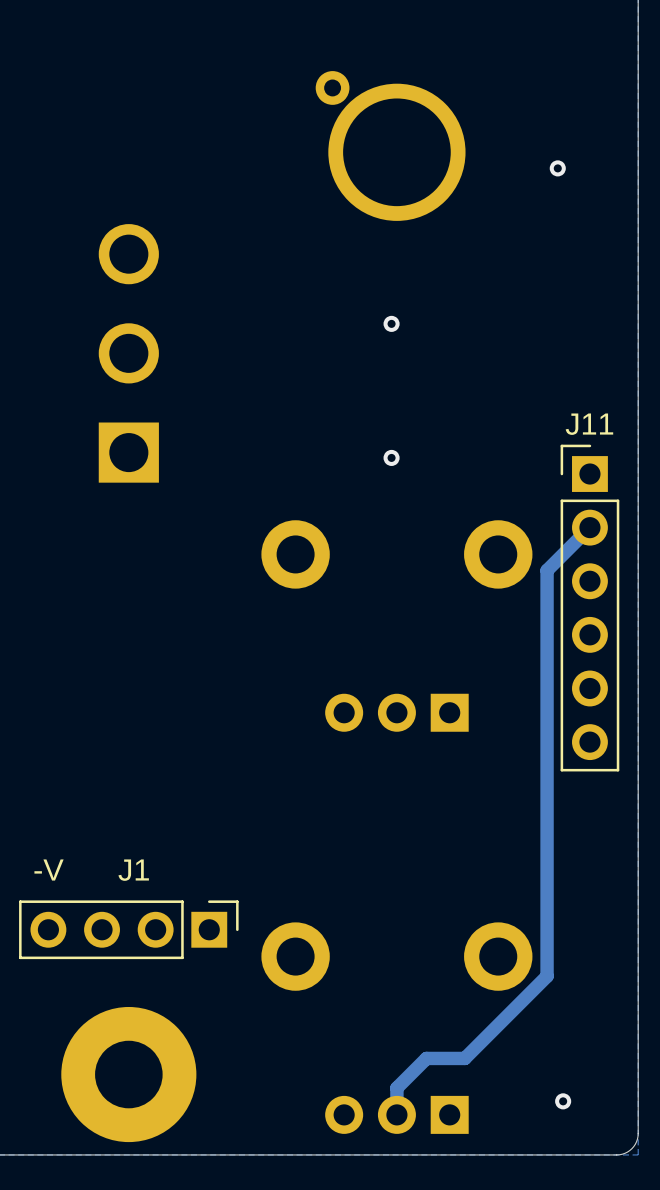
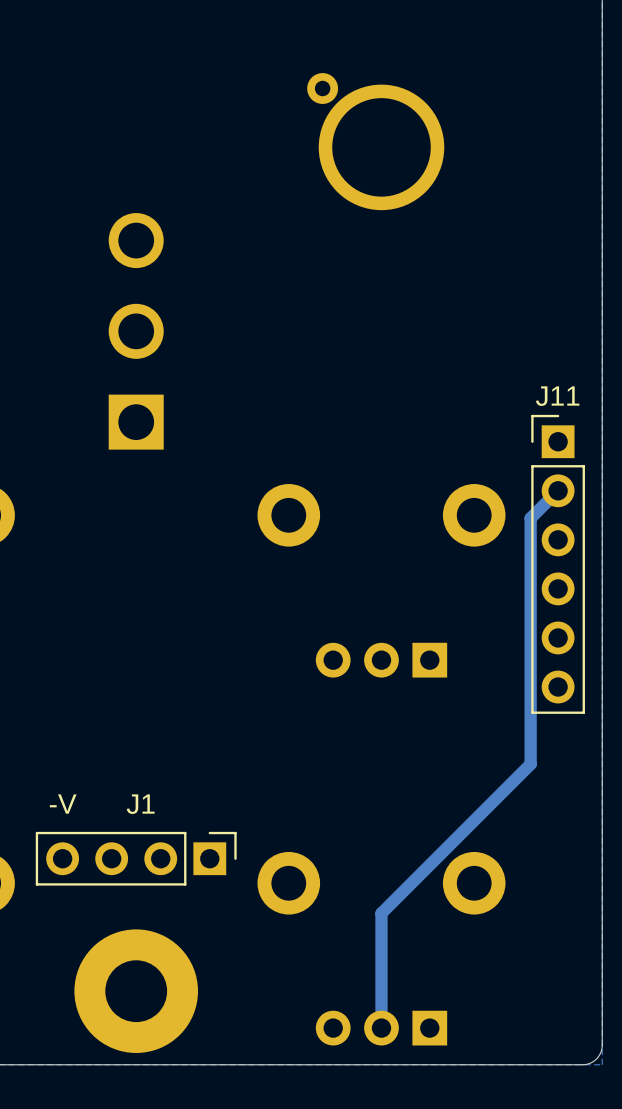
via: (557, 168) -> none
via: (391, 323) -> none
via: (391, 457) -> none
track: (559, 557) (547, 570) (547, 976) (464, 1058) (426, 1058) (396, 1088) -> (530, 518) (530, 764) (381, 913) (381, 1003)
via: (563, 1101) -> none

